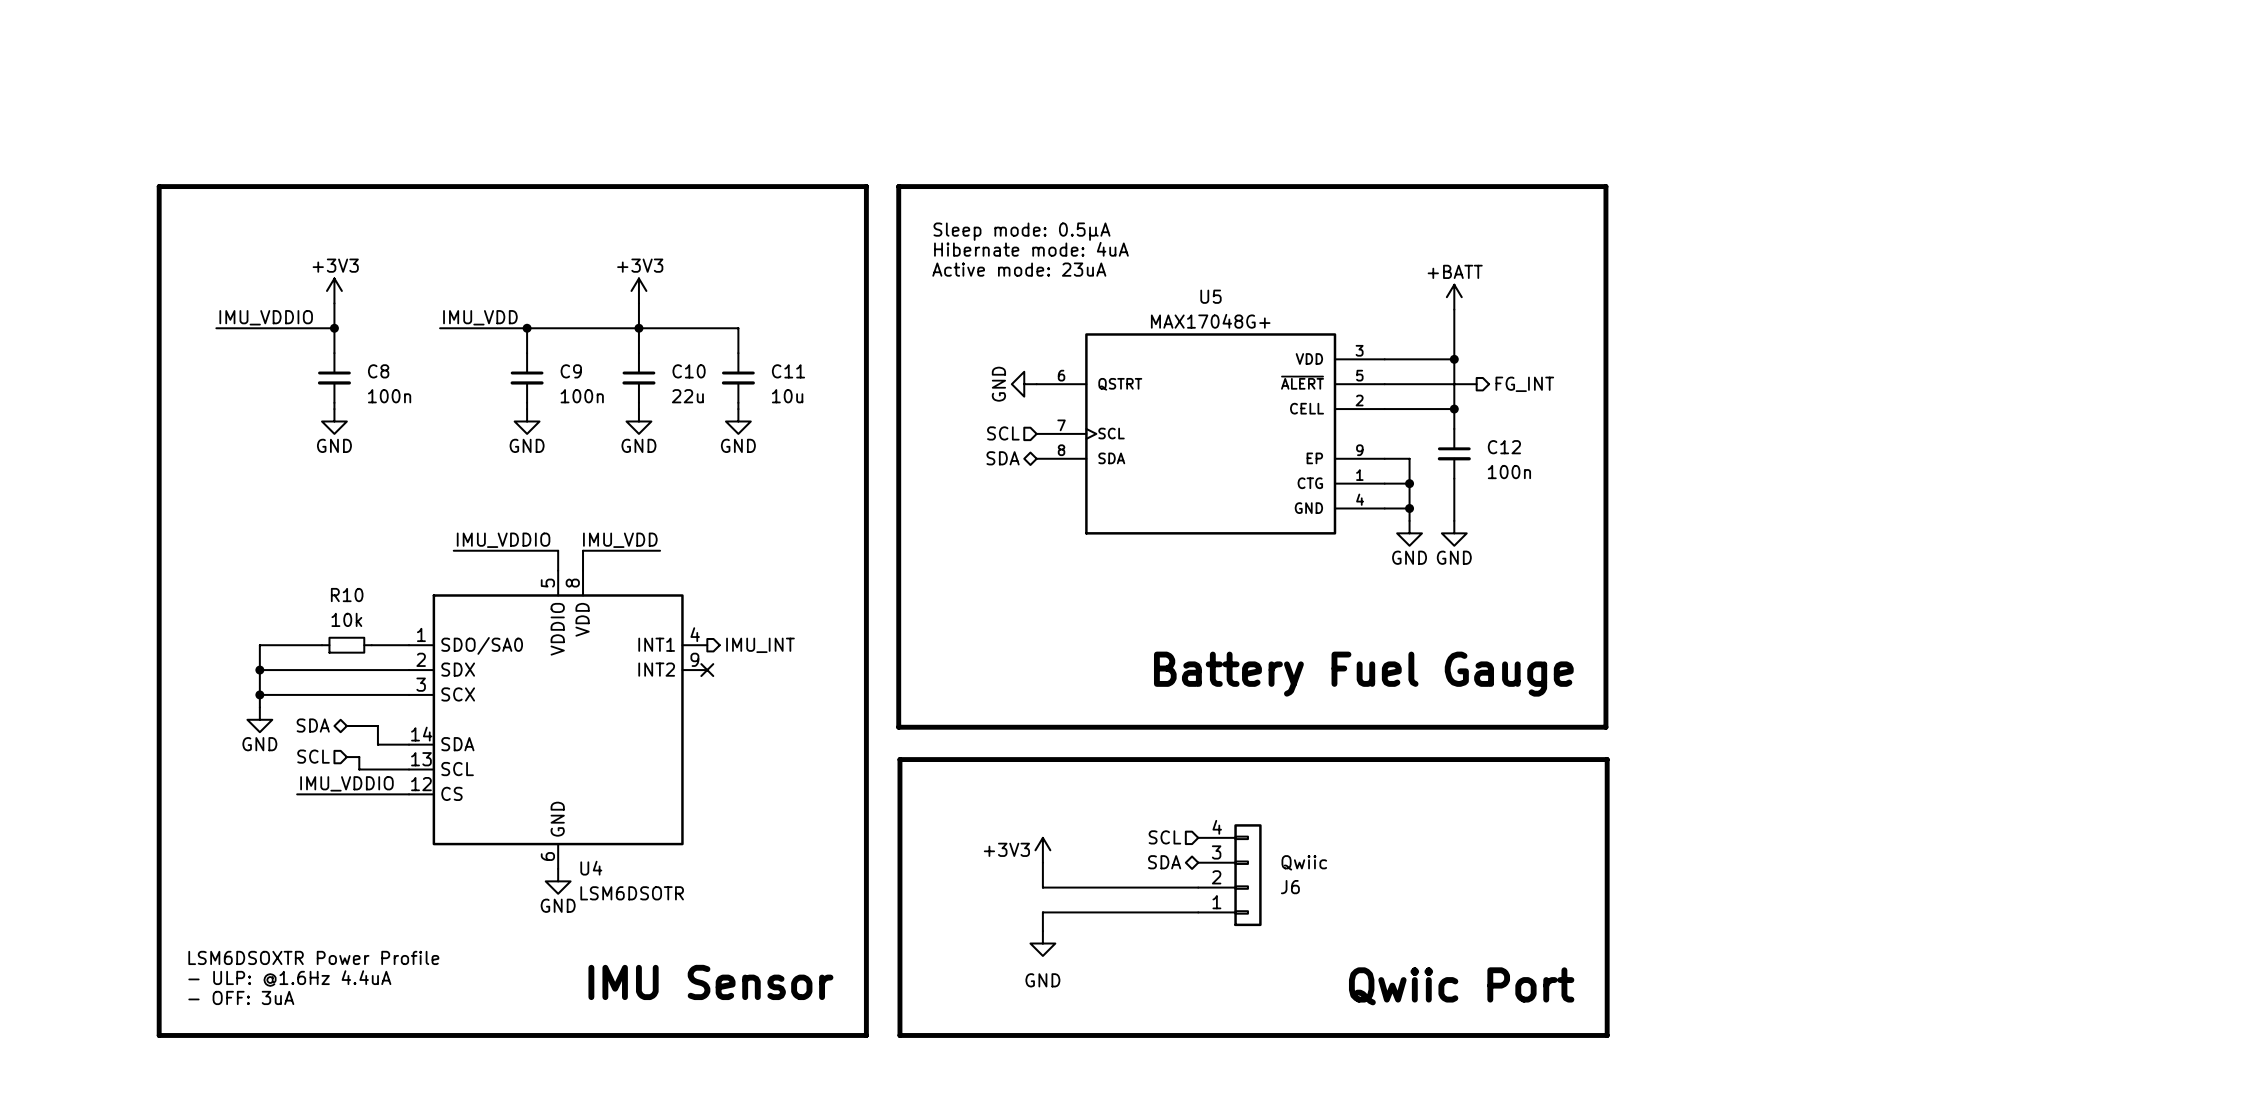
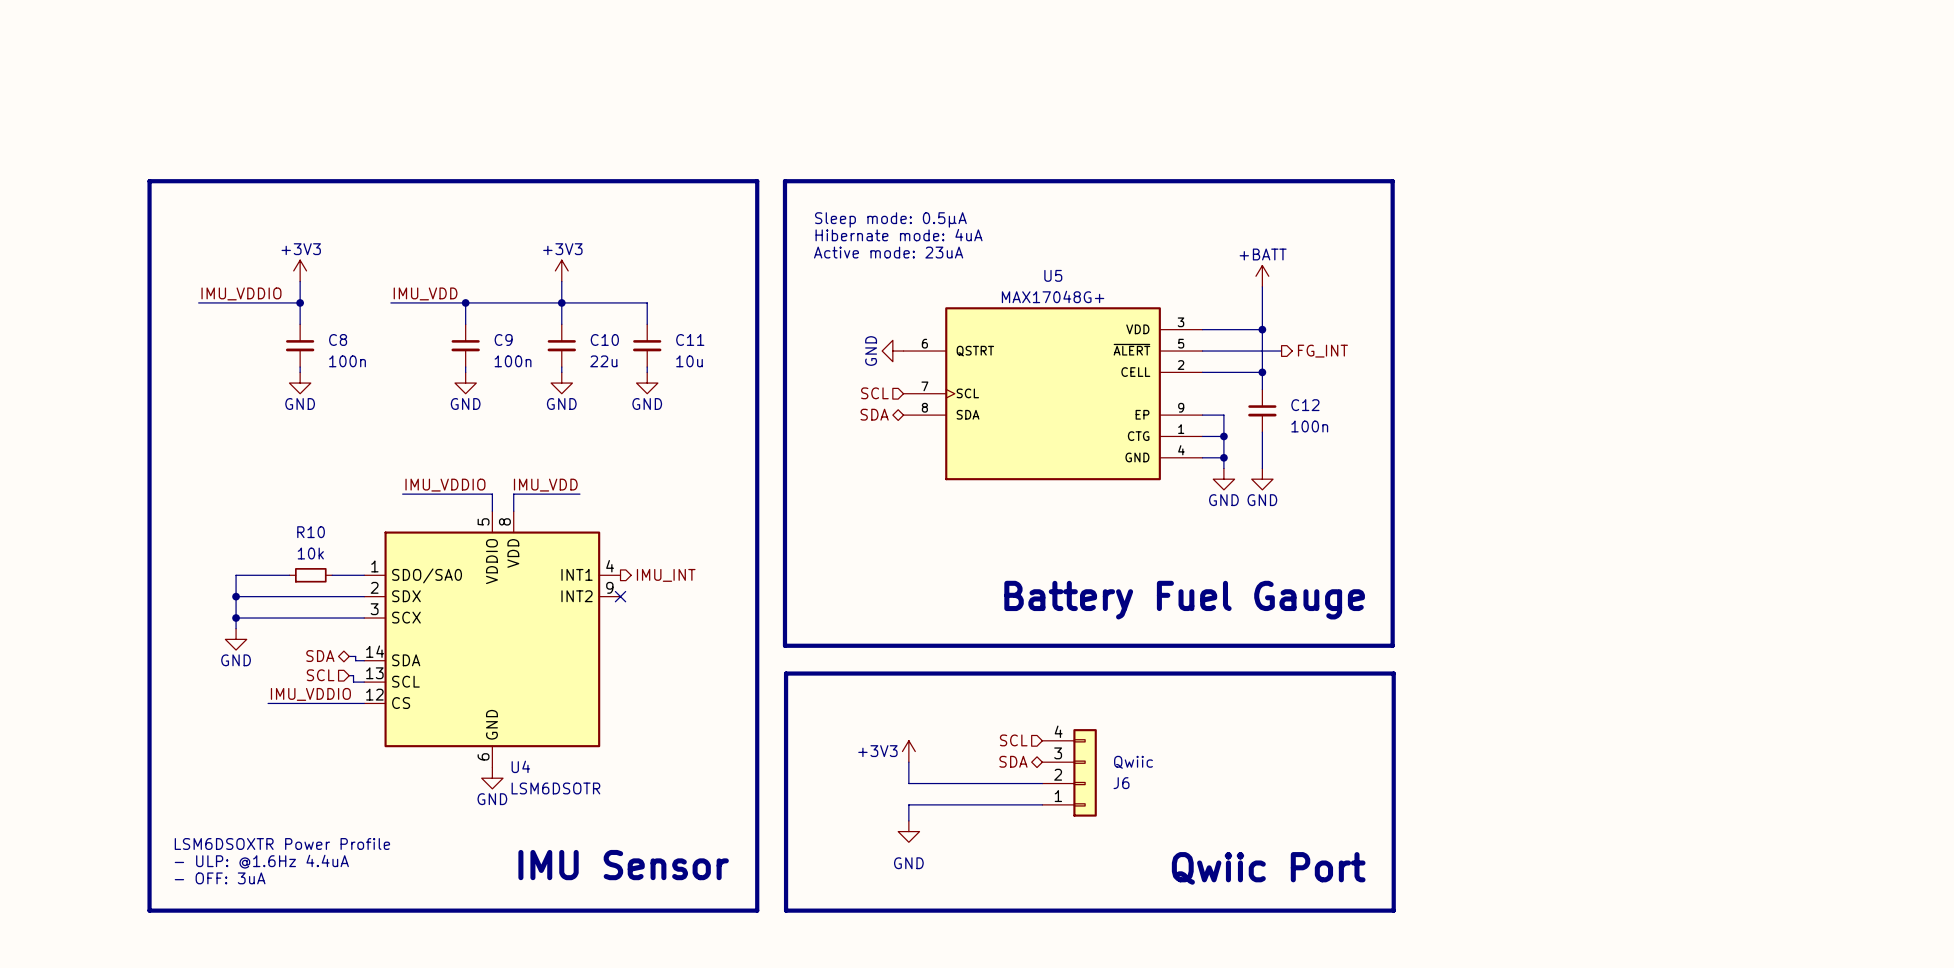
hierarchical label position: SDA (313, 725) -> SDA (320, 656)
wire: (346, 726) (377, 726) (377, 744) (399, 744) -> (349, 656) (355, 656) (355, 660)
hierarchical label position: SCL (313, 756) -> SCL (320, 675)
wire: (346, 757) (359, 757) (359, 769) (396, 769) -> (349, 675) (353, 675) (353, 682)

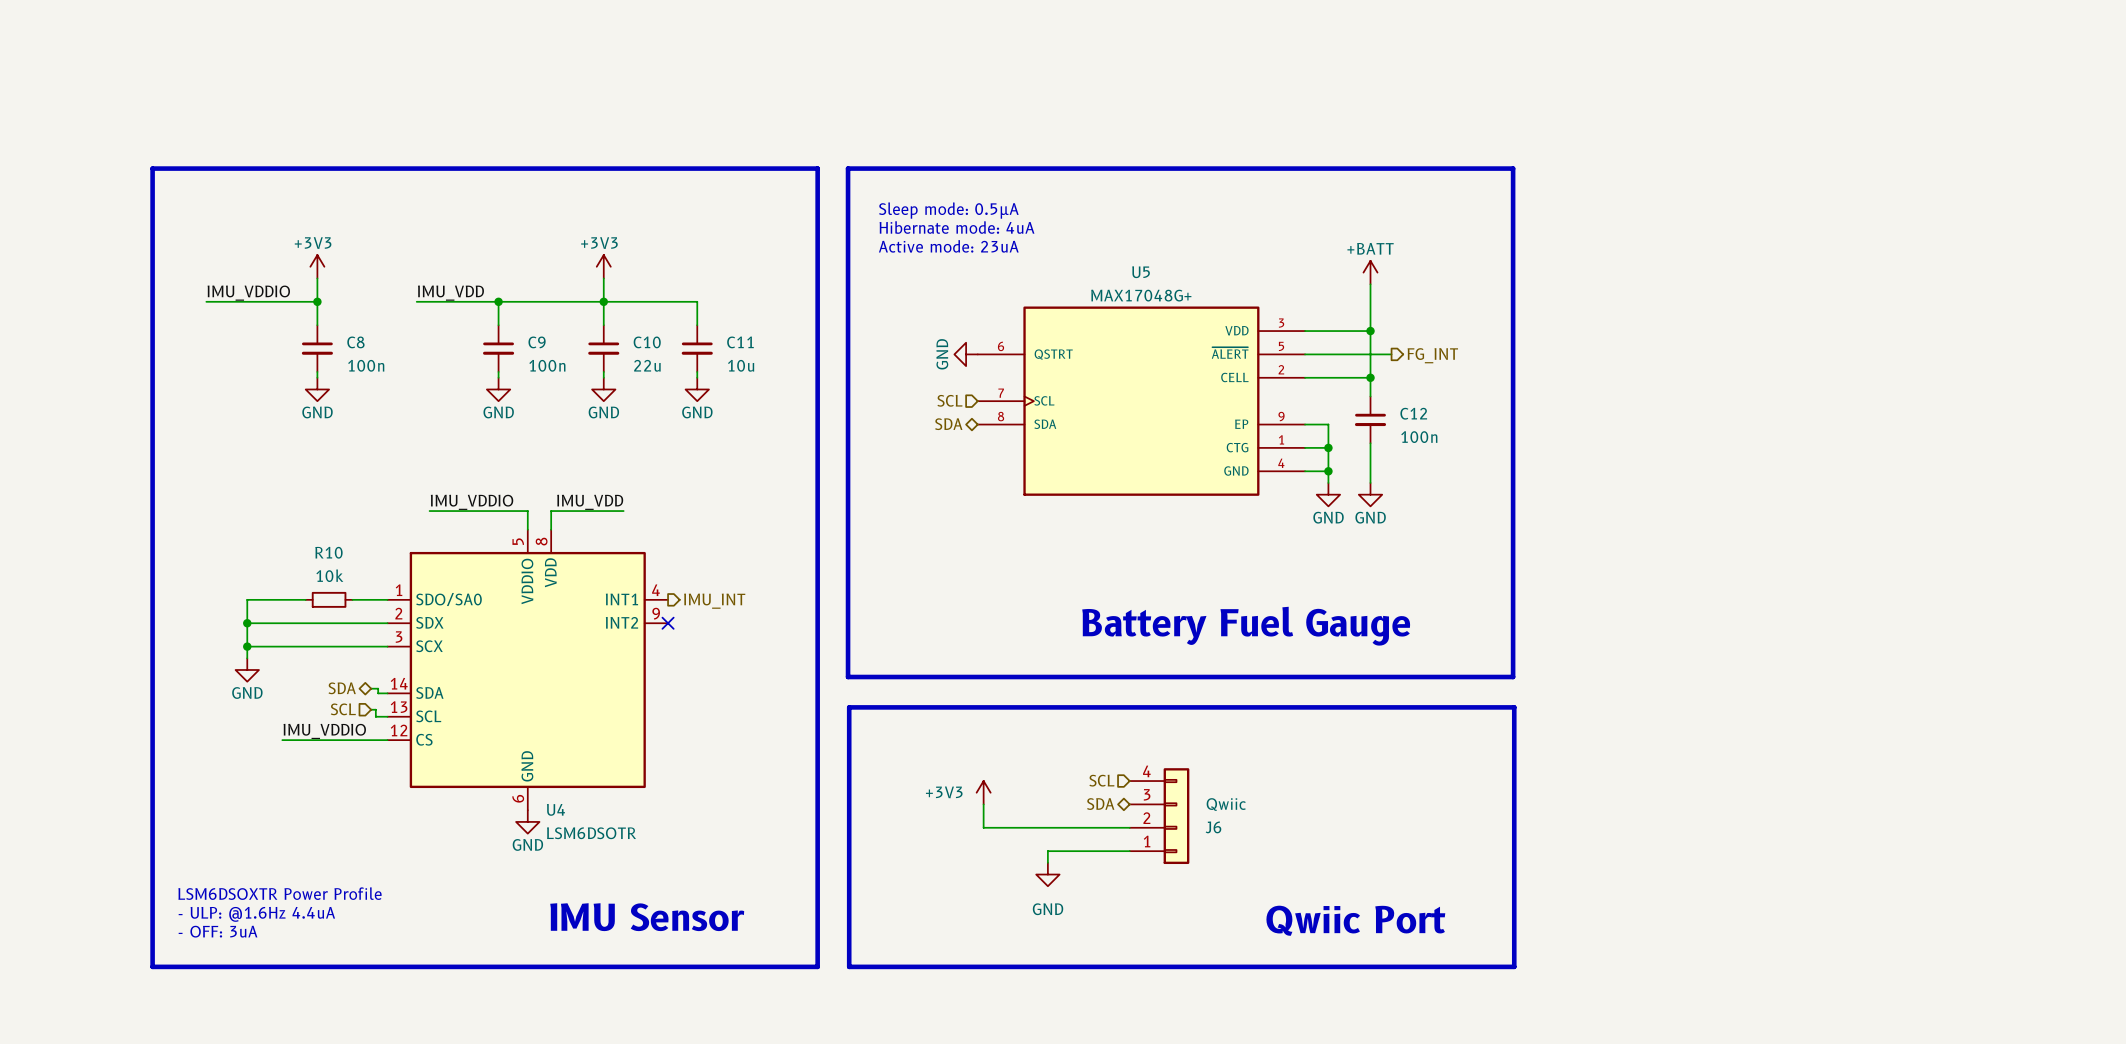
wire: (967, 804) (908, 804) (908, 820) -> (1047, 851) (1047, 862)
power symbol position: GND (908, 831) -> GND (1047, 874)

